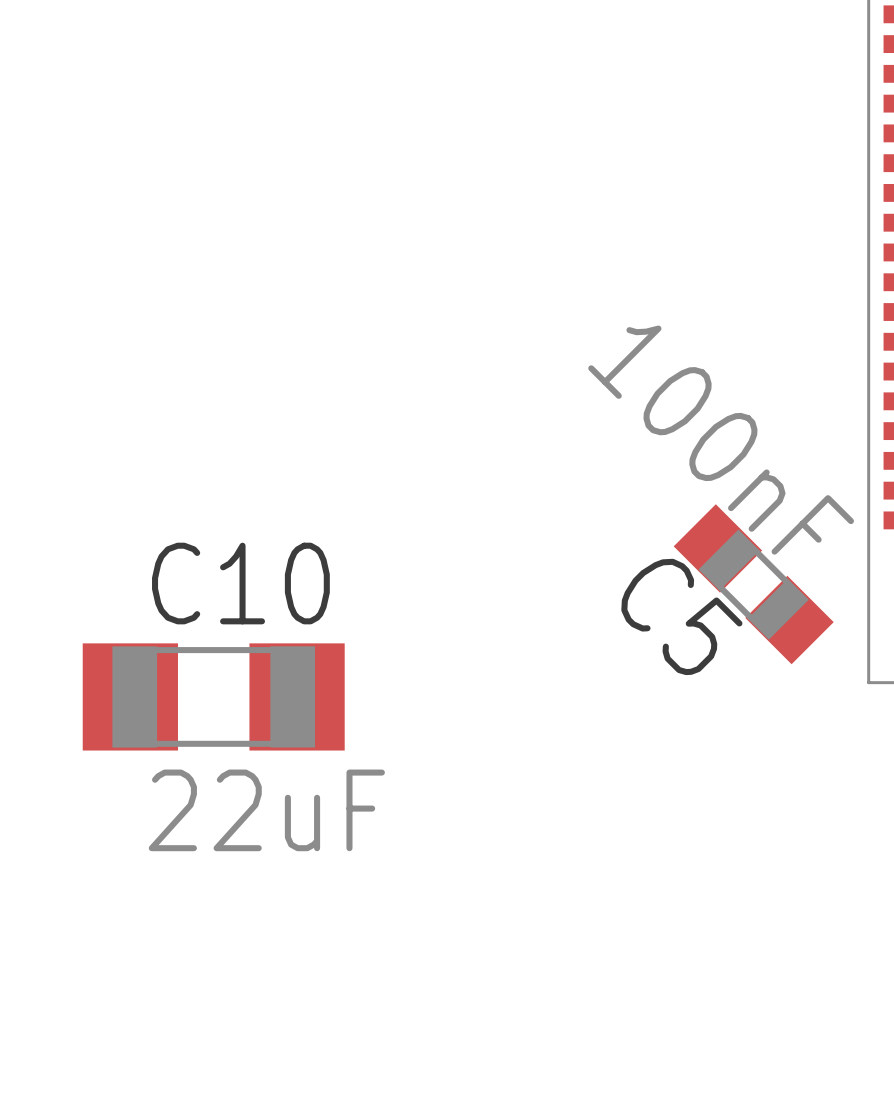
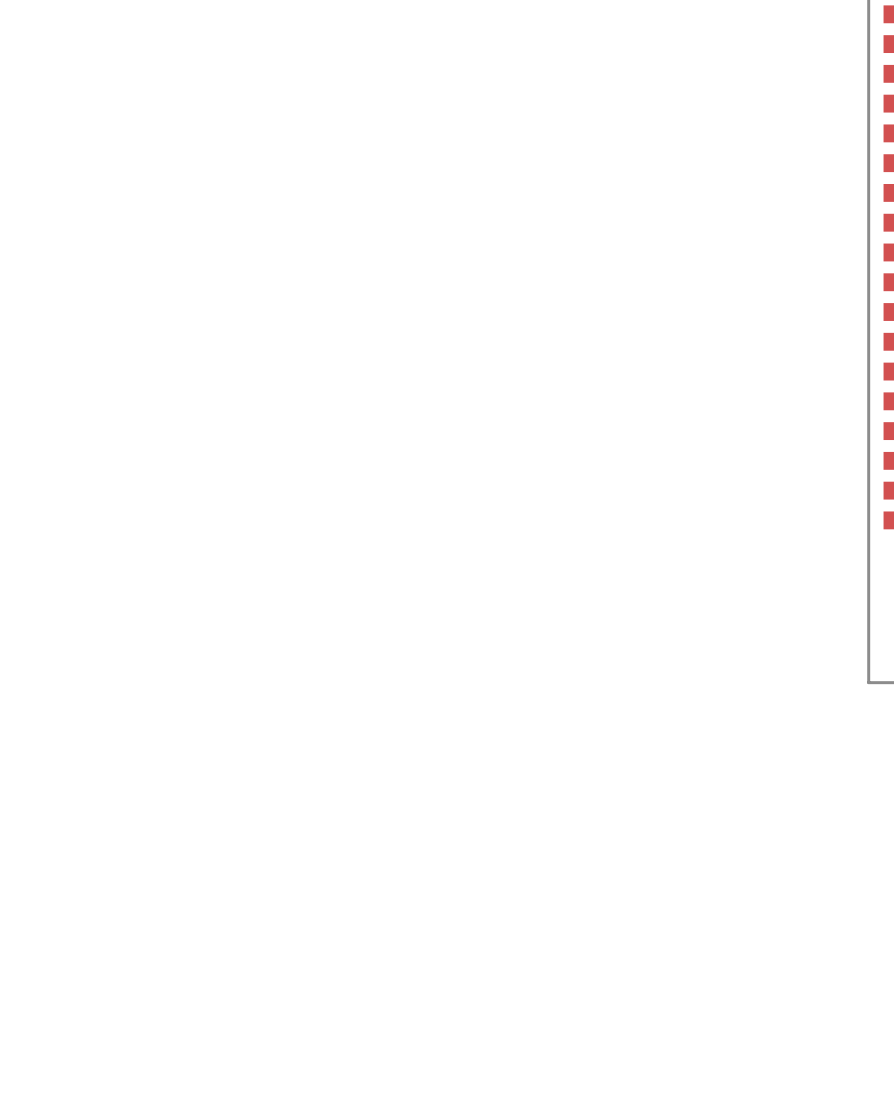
C5: 100nF (753, 584) -> none
C10: 22uF (213, 696) -> none

